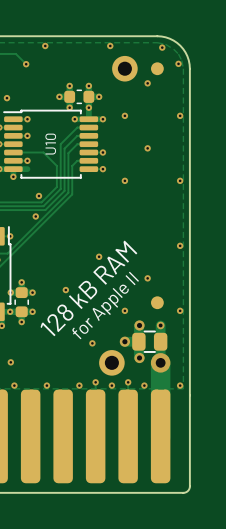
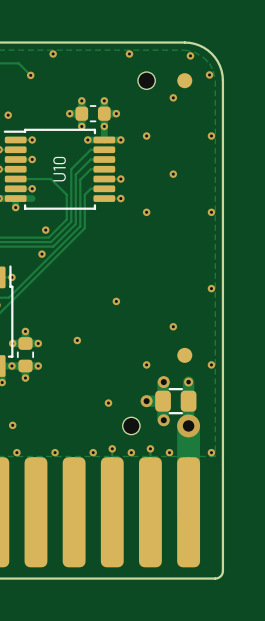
part footprint: [112, 55, 138, 82] -> [137, 72, 156, 90]
text: 128 kB RAM (88, 288) -> none
text: for Apple II (105, 305) -> none
part footprint: [99, 350, 125, 376] -> [122, 417, 141, 435]

